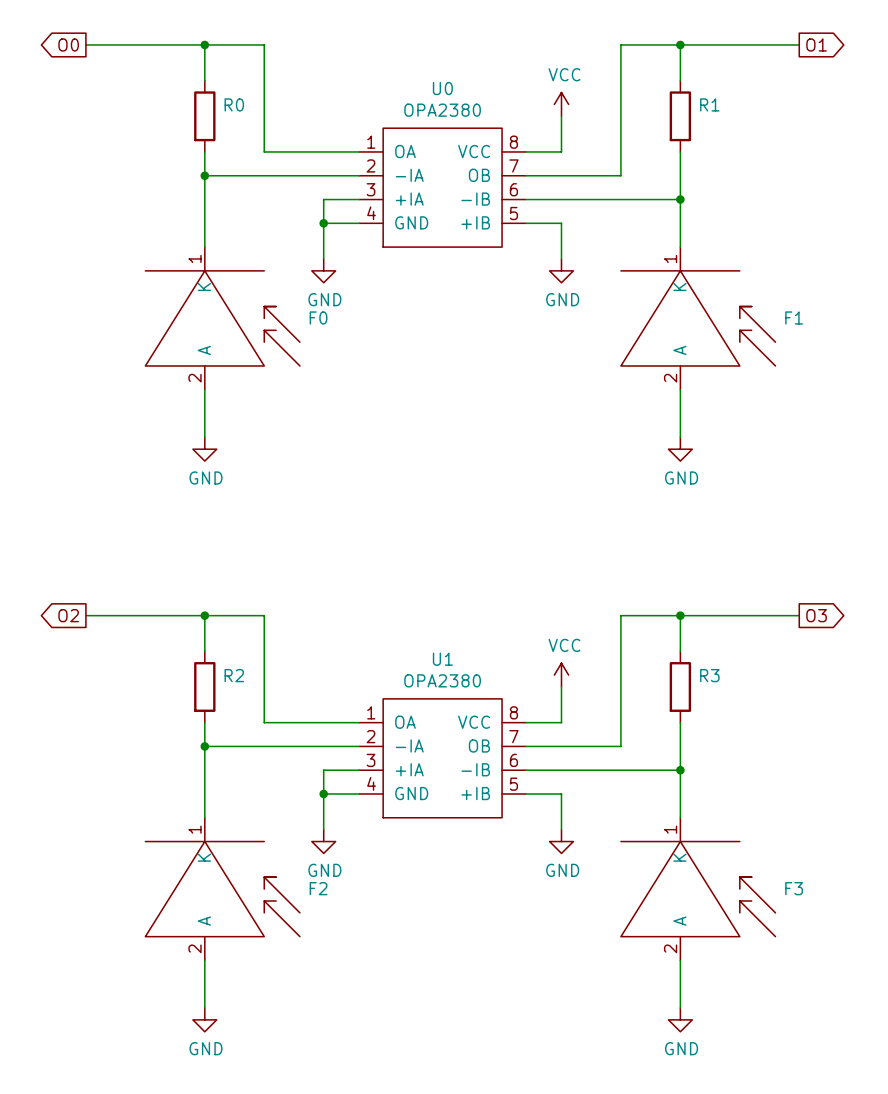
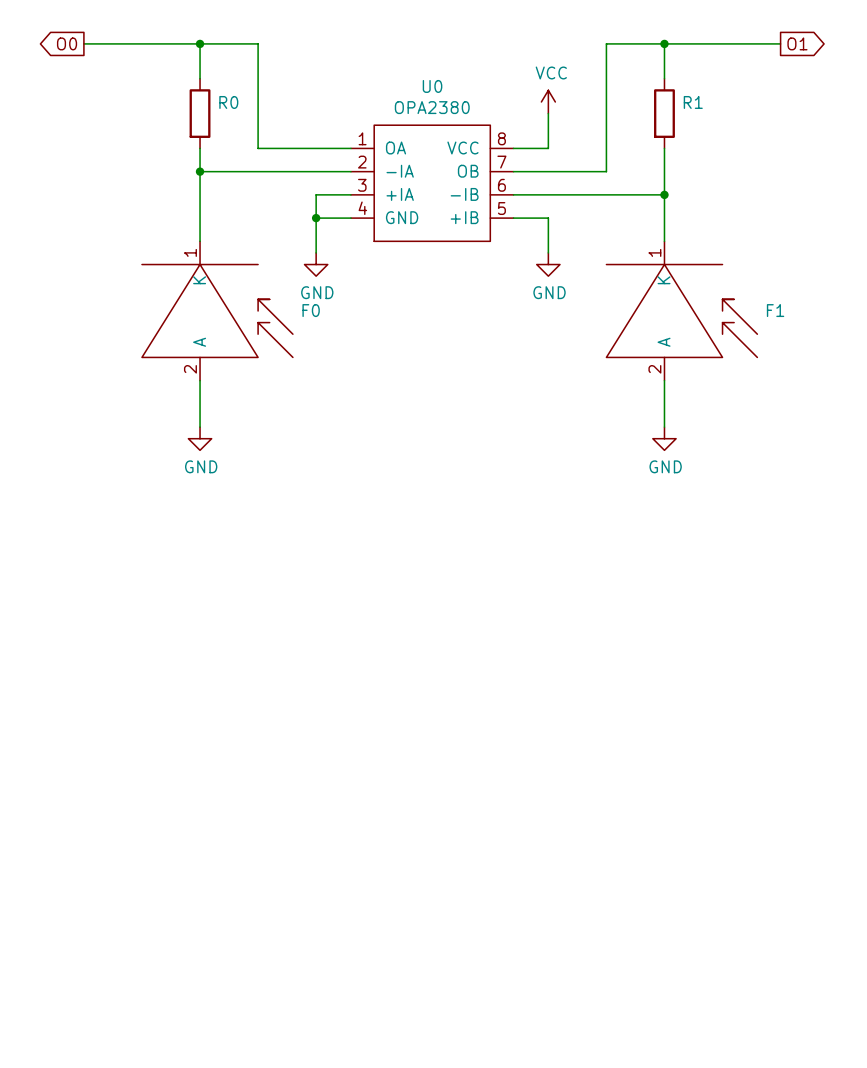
global label: O2 (68, 615) -> none
wire: (85, 615) (264, 615) (264, 722) (359, 722) -> none
wire: (204, 615) (204, 651) -> none
junction: (204, 615) -> none
wire: (680, 615) (680, 651) -> none
junction: (680, 615) -> none
wire: (799, 615) (620, 615) (620, 746) (525, 746) -> none
global label: O3 (816, 615) -> none
power symbol: VCC (561, 675) -> none
R2: (204, 686) -> none
wire: (561, 686) (561, 722) (525, 722) -> none
R3: (680, 686) -> none
wire: (204, 722) (204, 817) -> none
wire: (680, 722) (680, 817) -> none
wire: (204, 746) (359, 746) -> none
junction: (204, 746) -> none
U1: OPA2380 (442, 758) -> none
wire: (359, 770) (323, 770) (323, 829) -> none
wire: (525, 770) (680, 770) -> none
junction: (680, 770) -> none
wire: (323, 793) (359, 793) -> none
junction: (323, 793) -> none
wire: (525, 793) (561, 793) (561, 829) -> none
power symbol: GND (323, 841) -> none
power symbol: GND (561, 841) -> none
F2: (222, 889) -> none
F3: (698, 889) -> none
wire: (204, 960) (204, 1007) -> none
wire: (680, 960) (680, 1007) -> none
power symbol: GND (204, 1019) -> none
power symbol: GND (680, 1019) -> none

